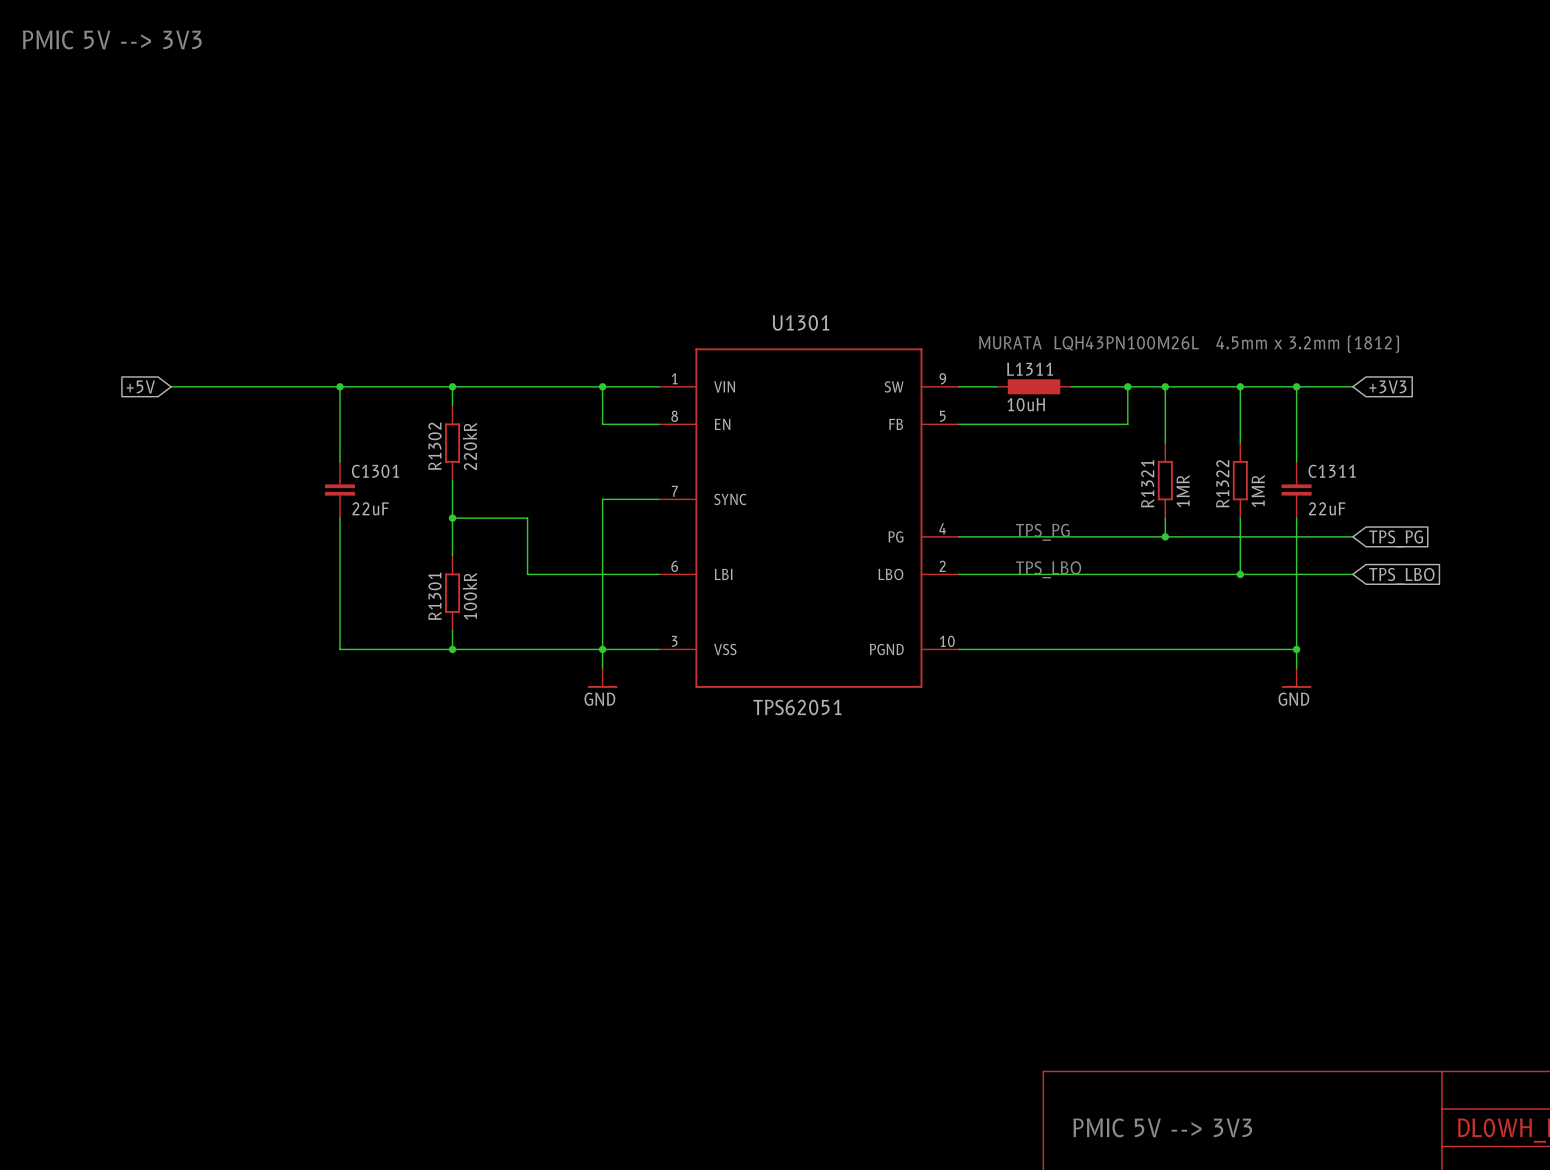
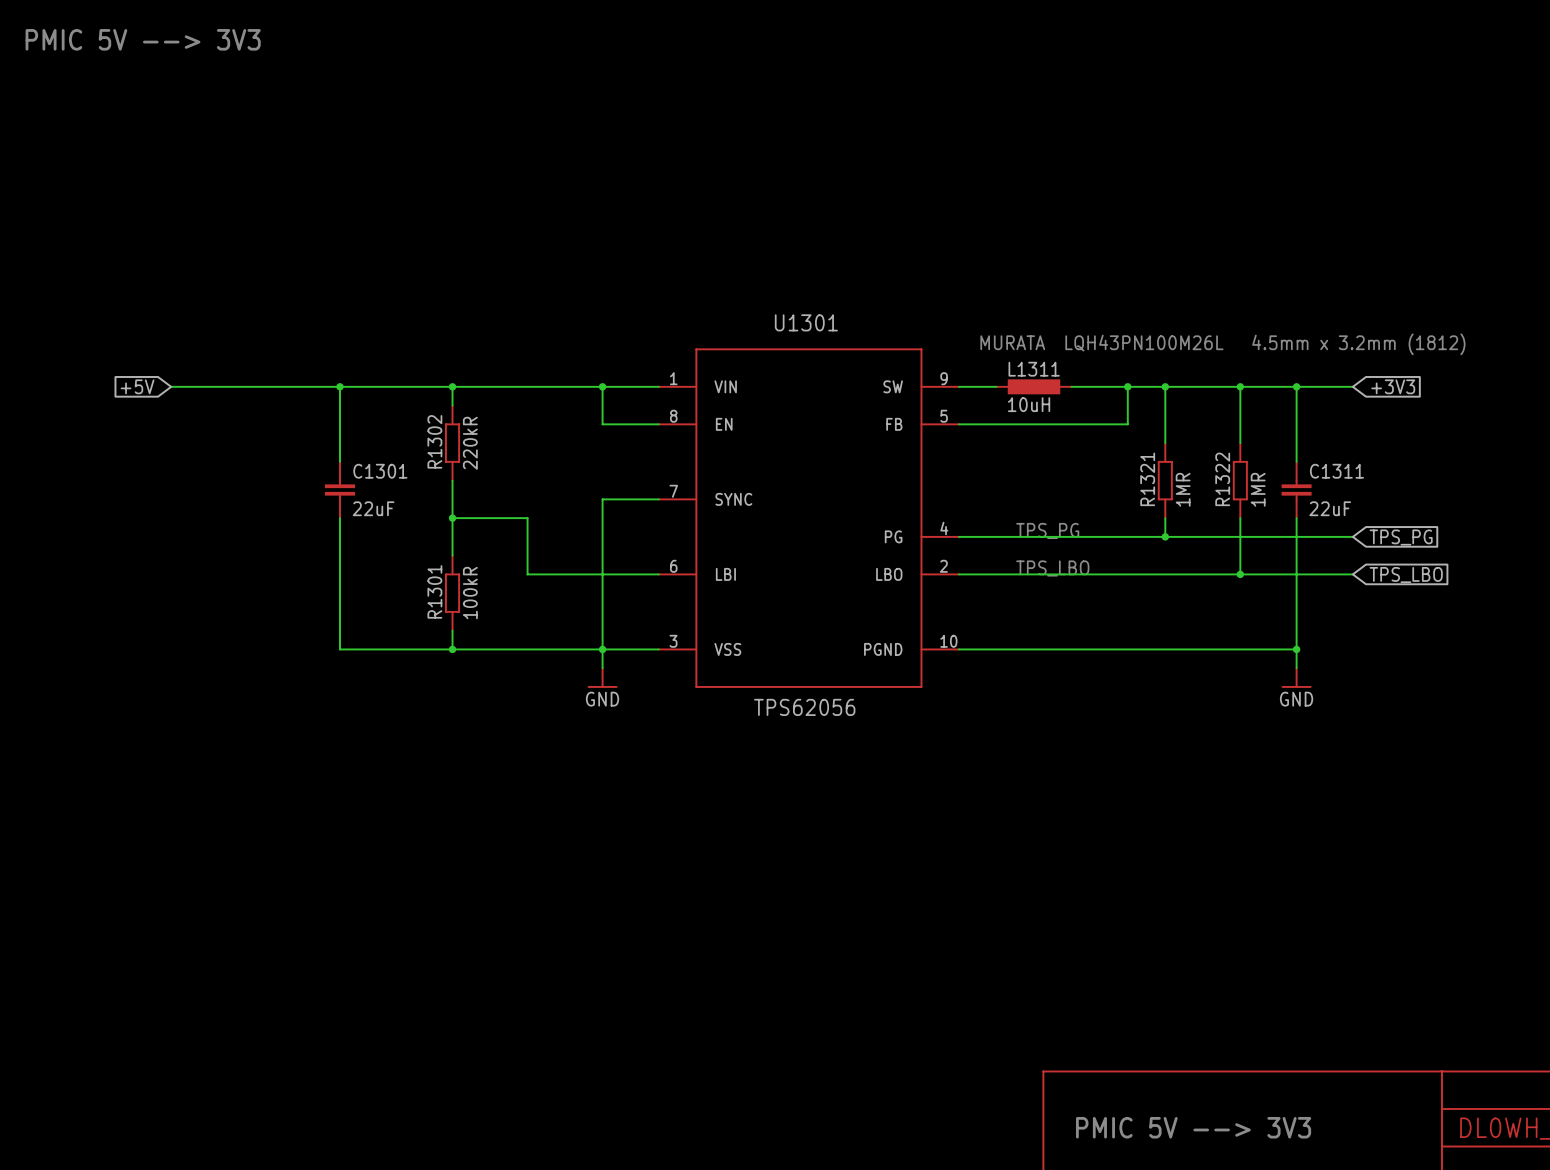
U1301 value: TPS62051 (797, 707) -> TPS62056 (804, 707)

